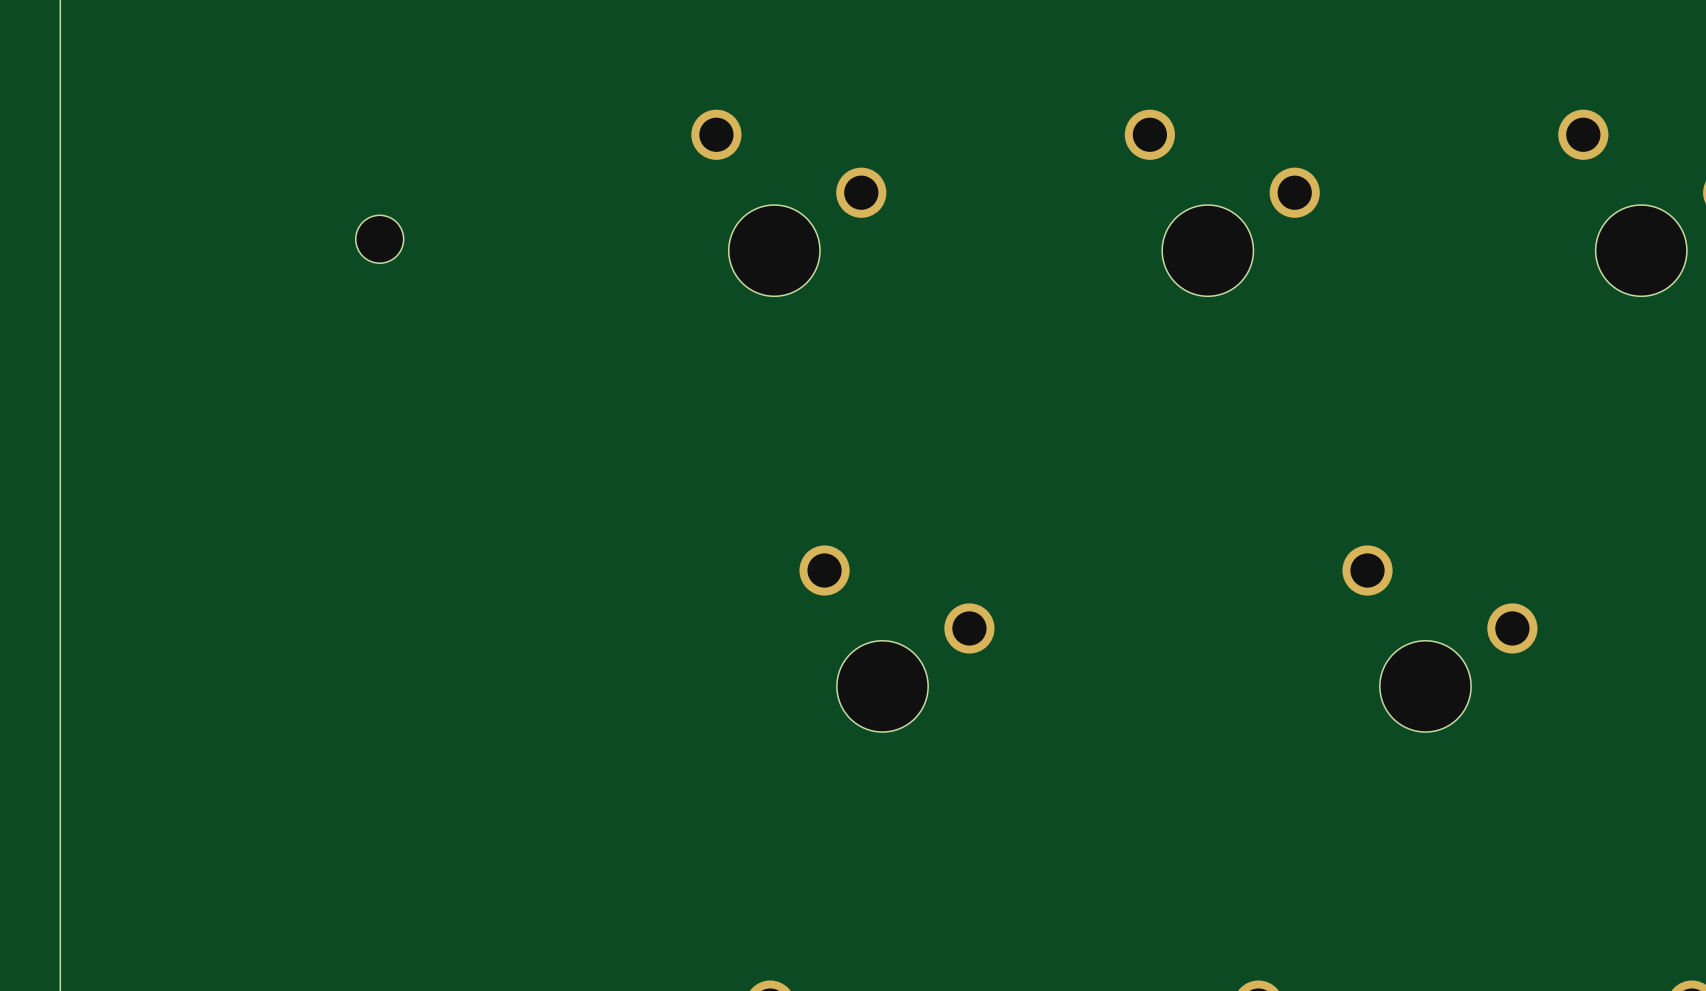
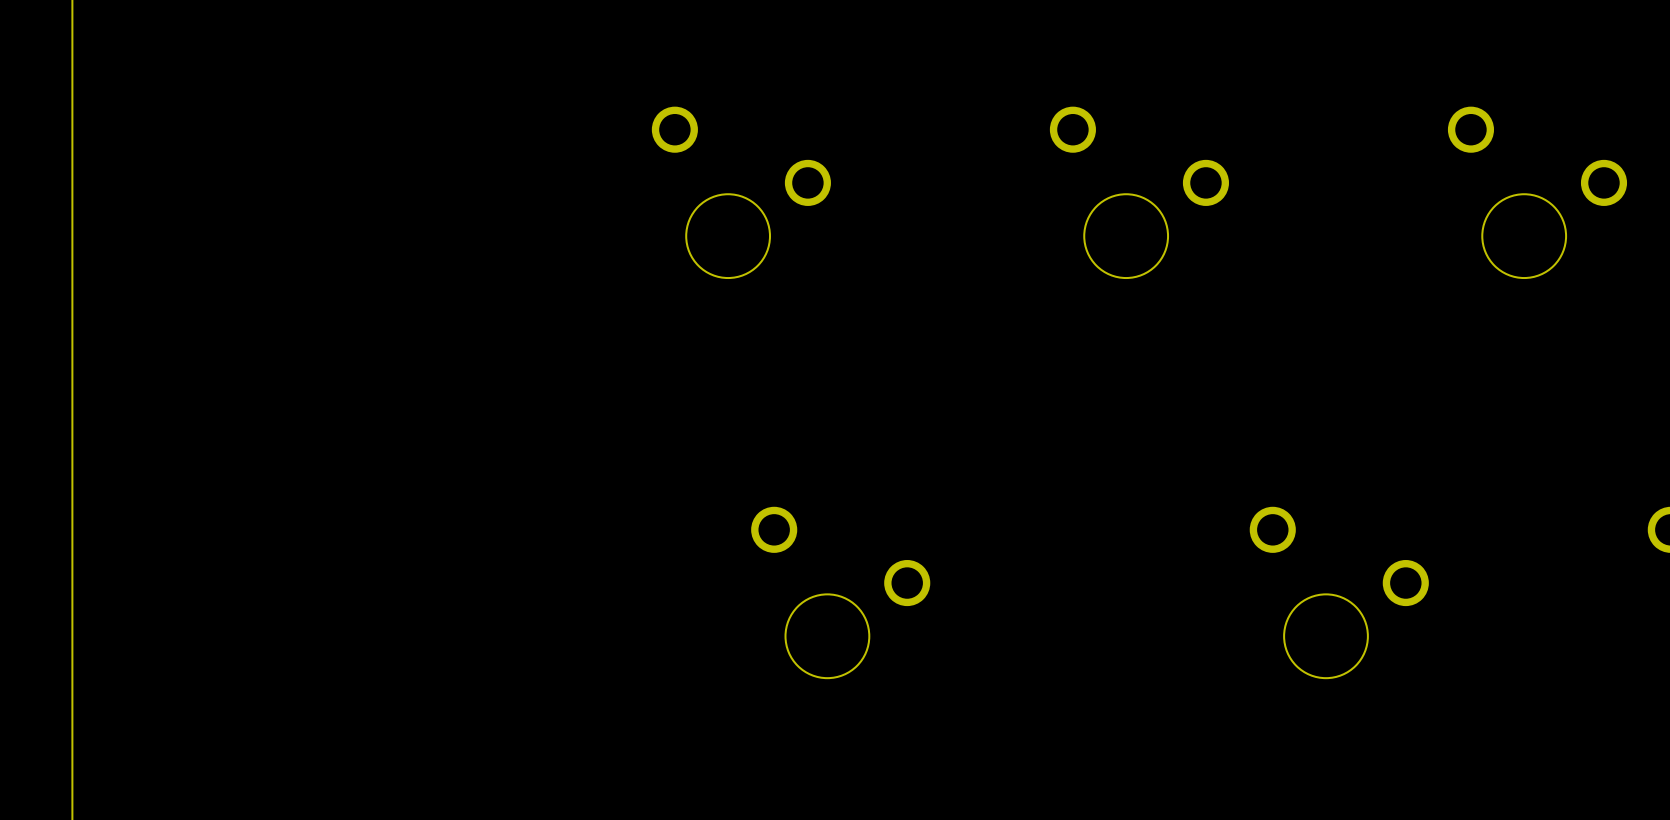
part: (379, 239) -> none

